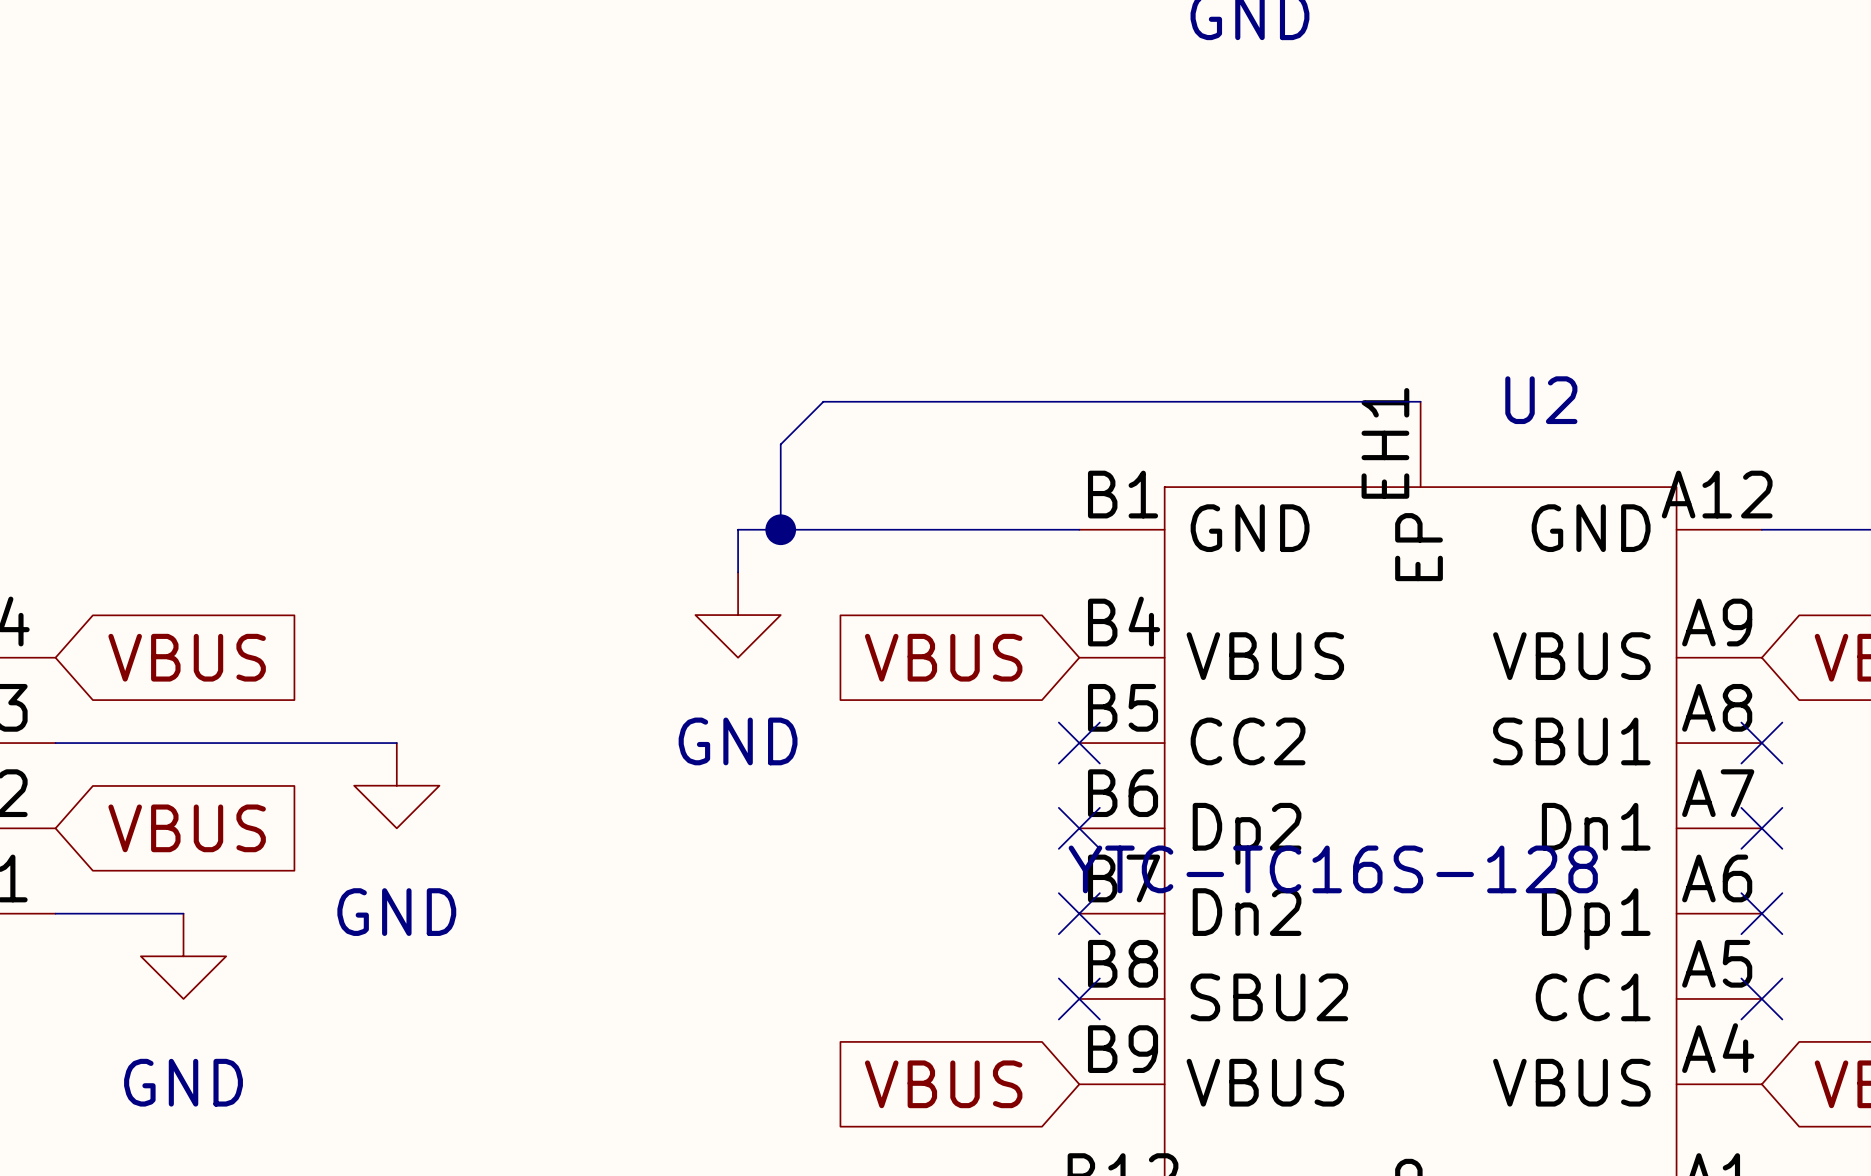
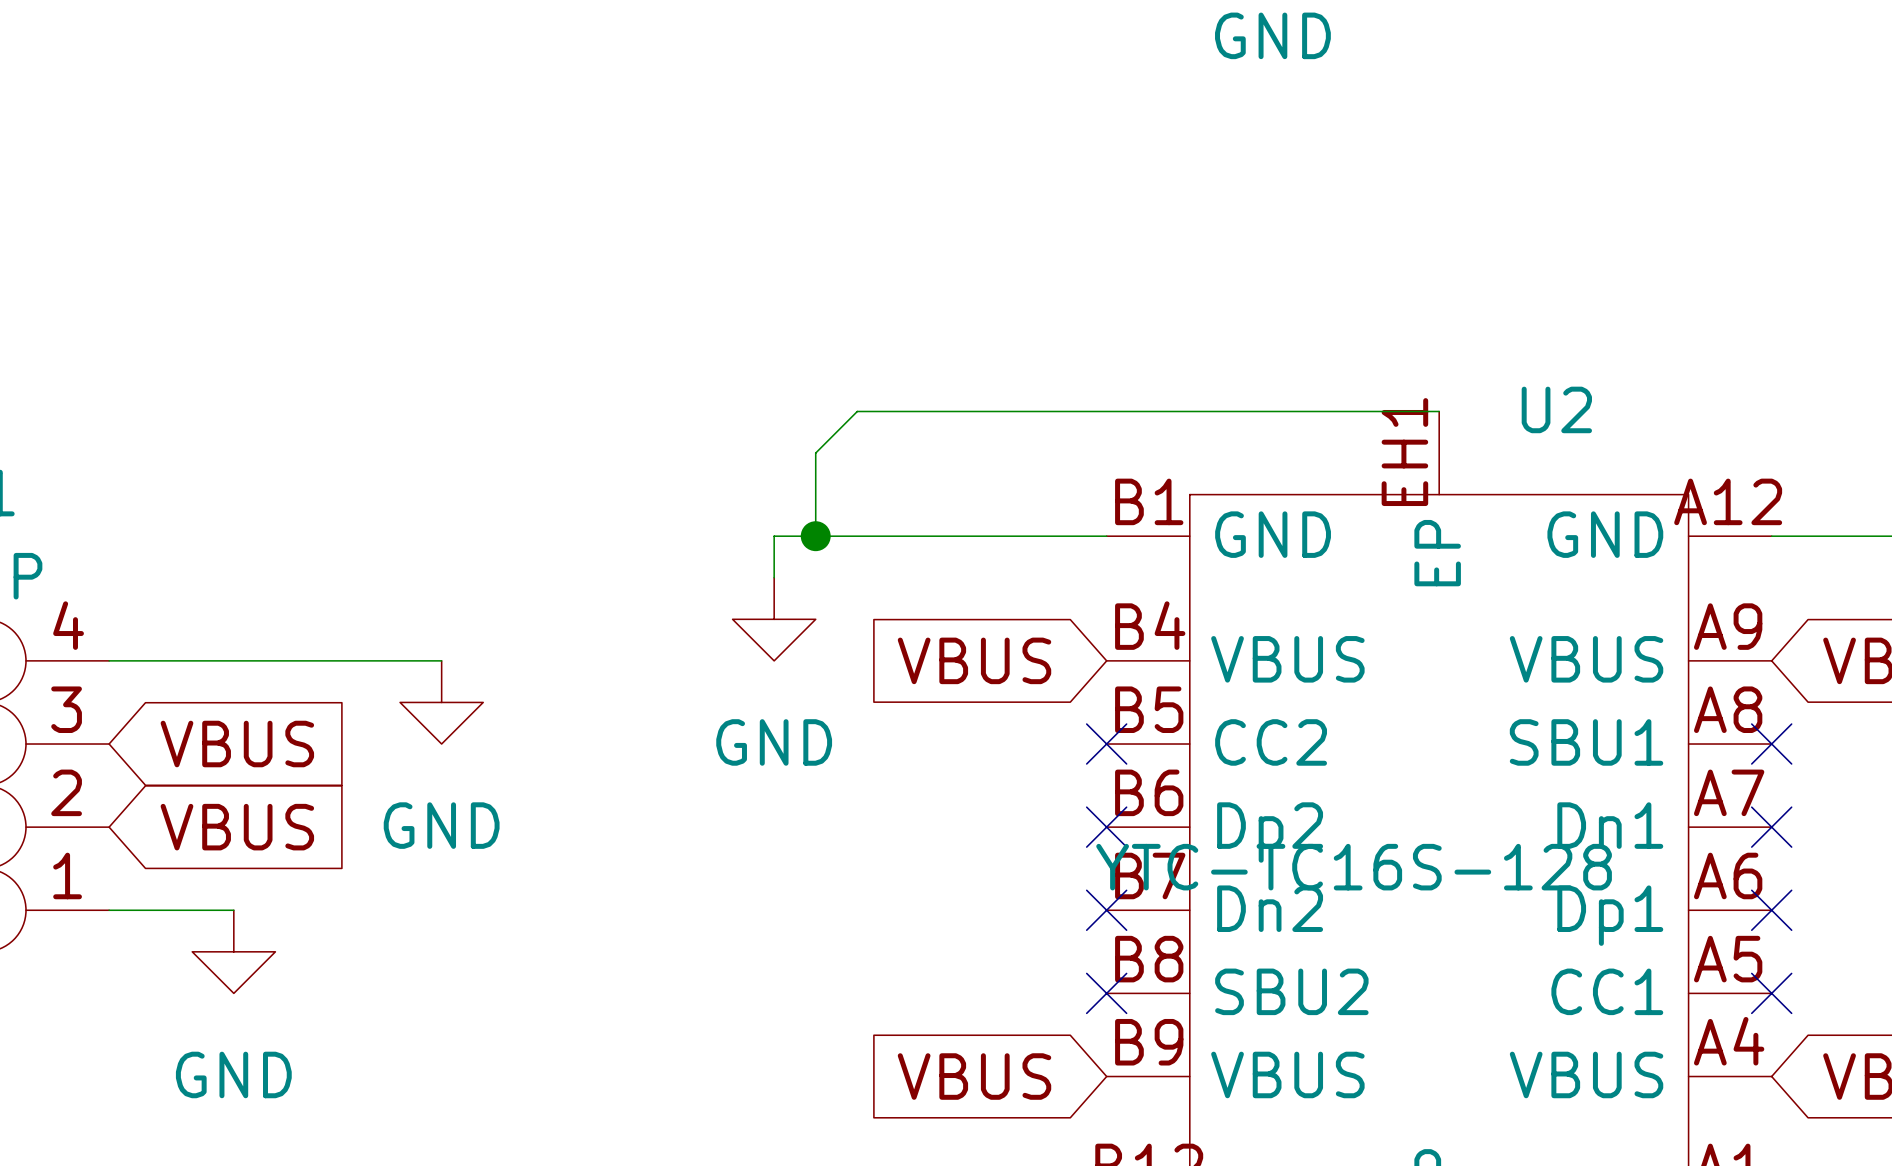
global label position: VBUS (187, 657) -> VBUS (237, 744)
wire: (55, 743) (396, 743) -> (109, 660) (441, 660)
power symbol position: GND (396, 785) -> GND (441, 702)

